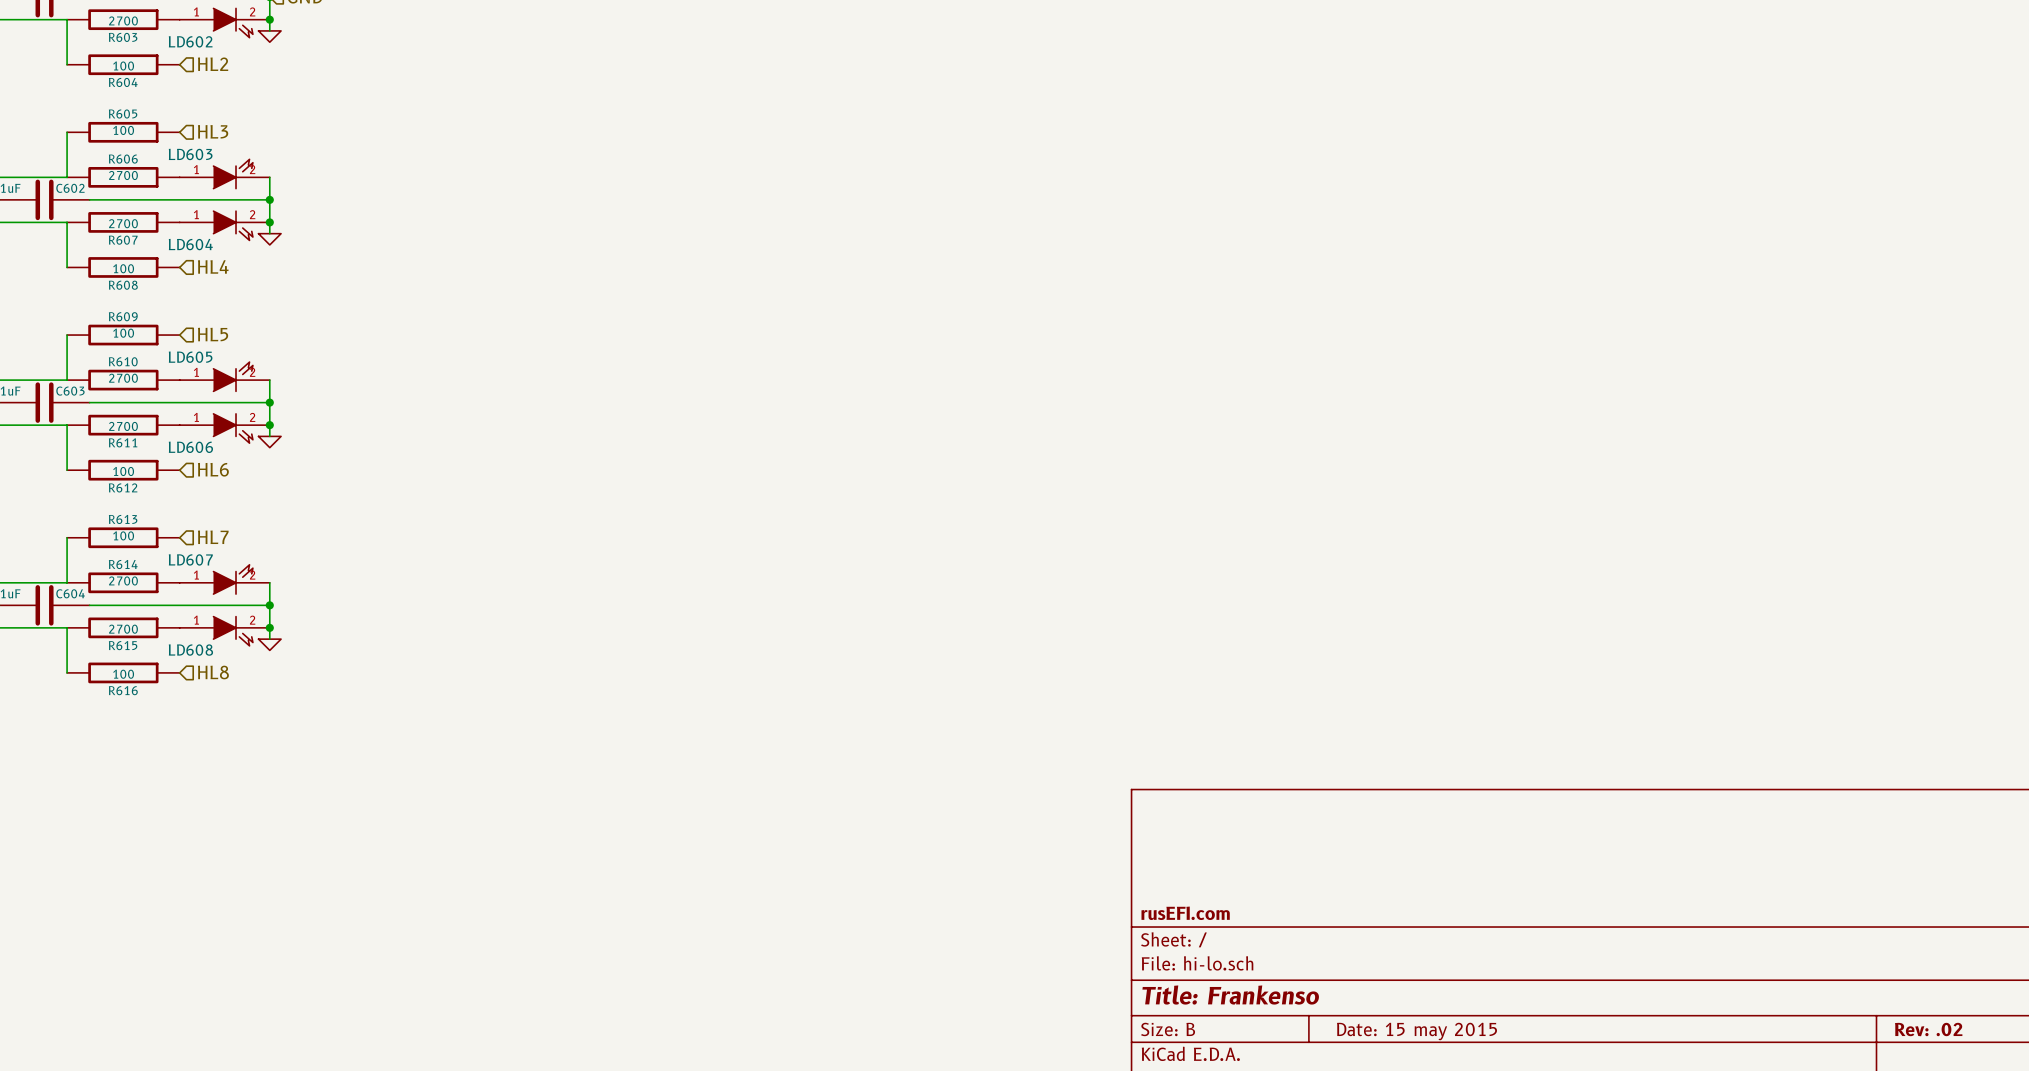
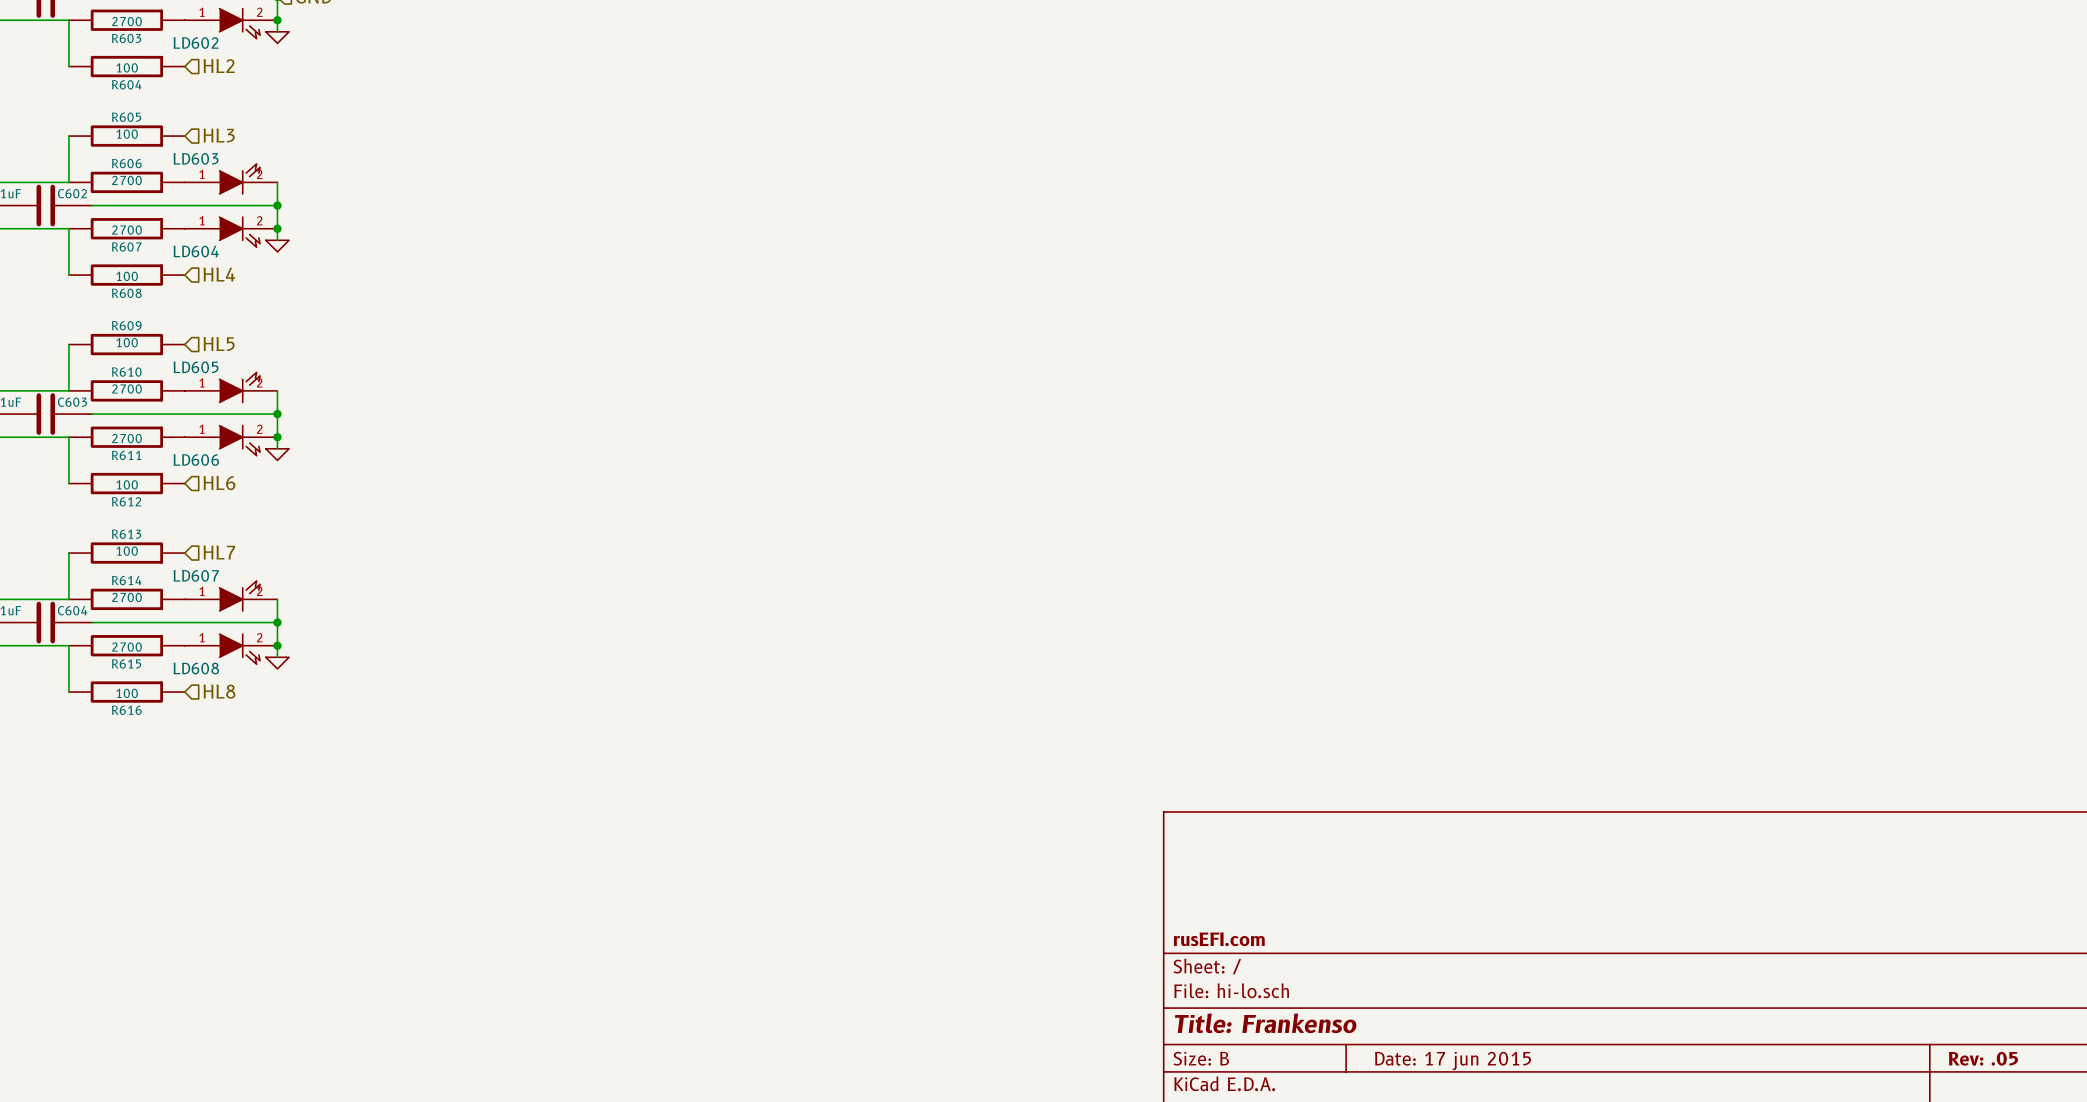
title block: Rev: .02 (1928, 1029) -> Rev: .05 (1983, 1058)
title block: Date: 15 may 2015 (1416, 1031) -> Date: 17 jun 2015 (1452, 1060)

